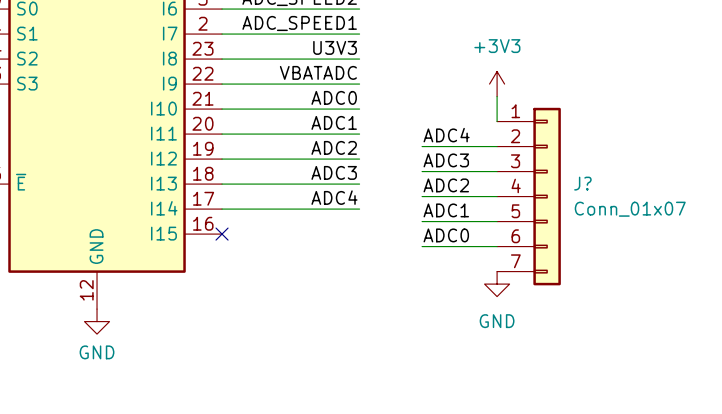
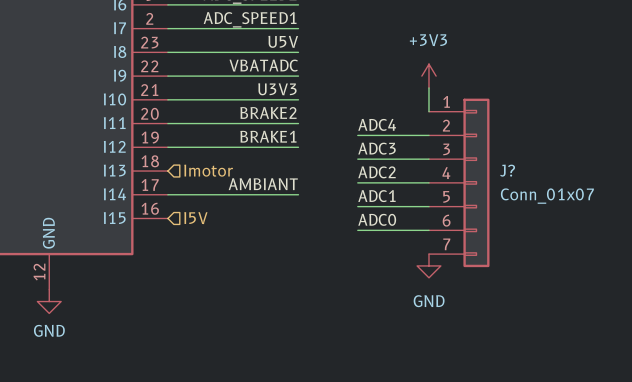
label: U3V3 (335, 47) -> U5V (283, 41)
label: ADC0 (334, 97) -> U3V3 (277, 89)
label: ADC1 (334, 122) -> BRAKE2 (268, 112)
label: ADC2 (334, 147) -> BRAKE1 (268, 136)
label: ADC3 (334, 172) -> none
hierarchical label: none -> Imotor (208, 170)
wire: (222, 184) (359, 184) -> none
label: ADC4 (334, 197) -> AMBIANT (263, 184)
hierarchical label: none -> I5V (195, 218)
no-connect mark: (222, 234) -> none

